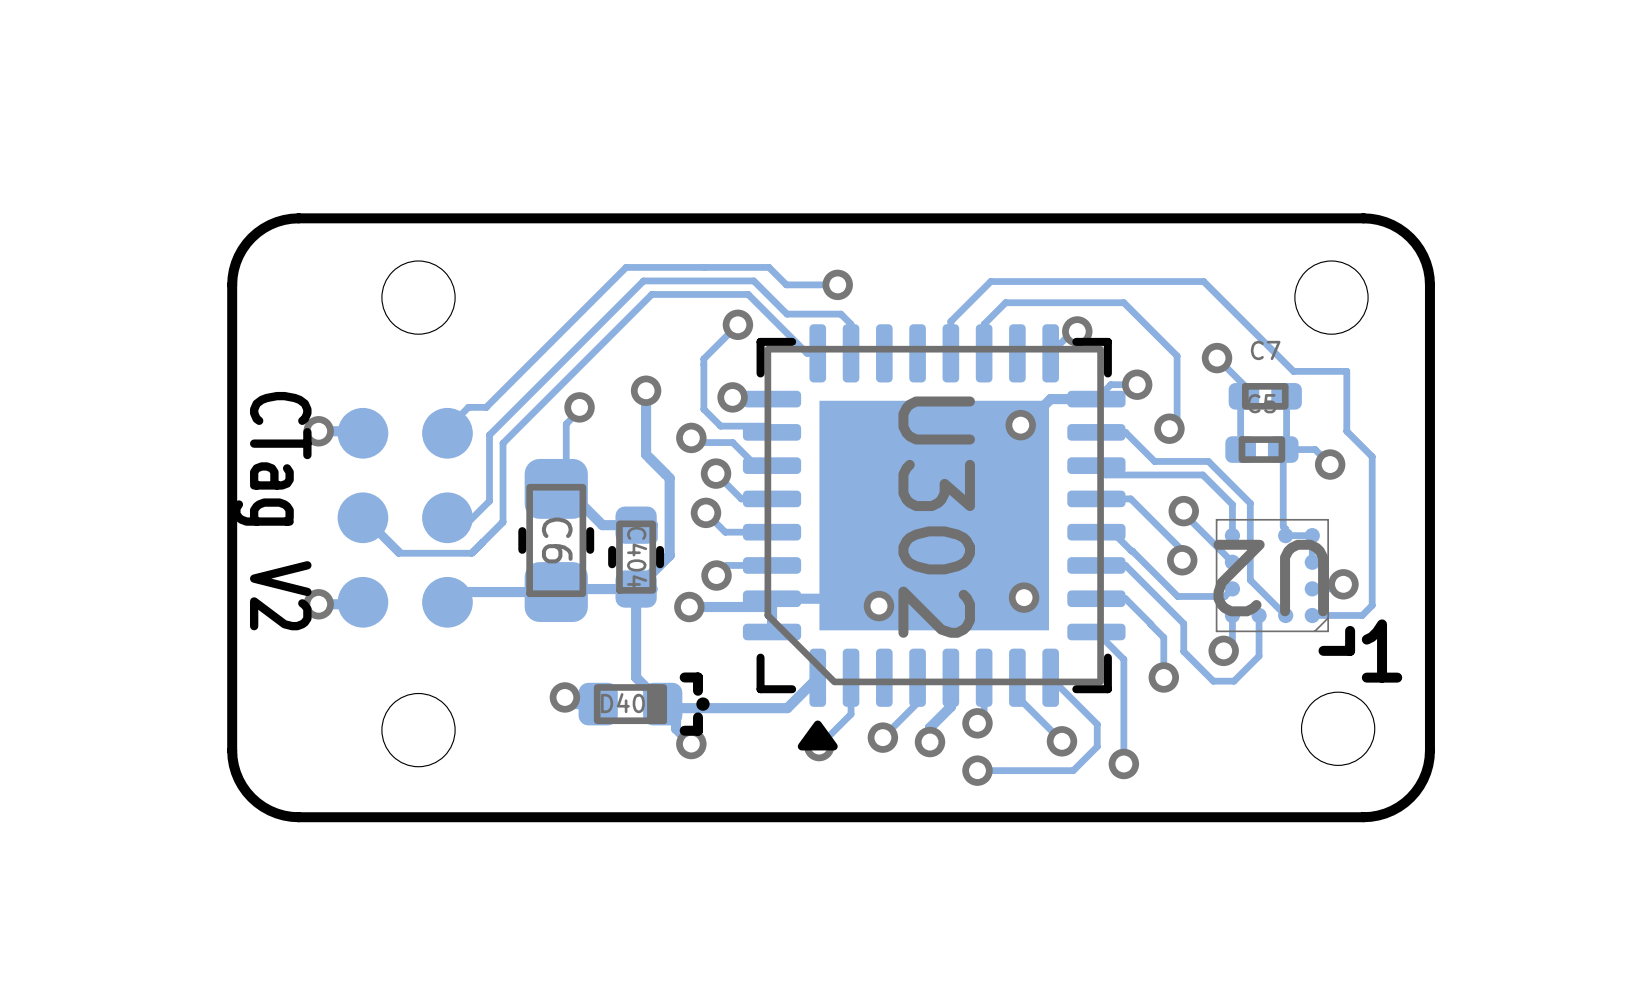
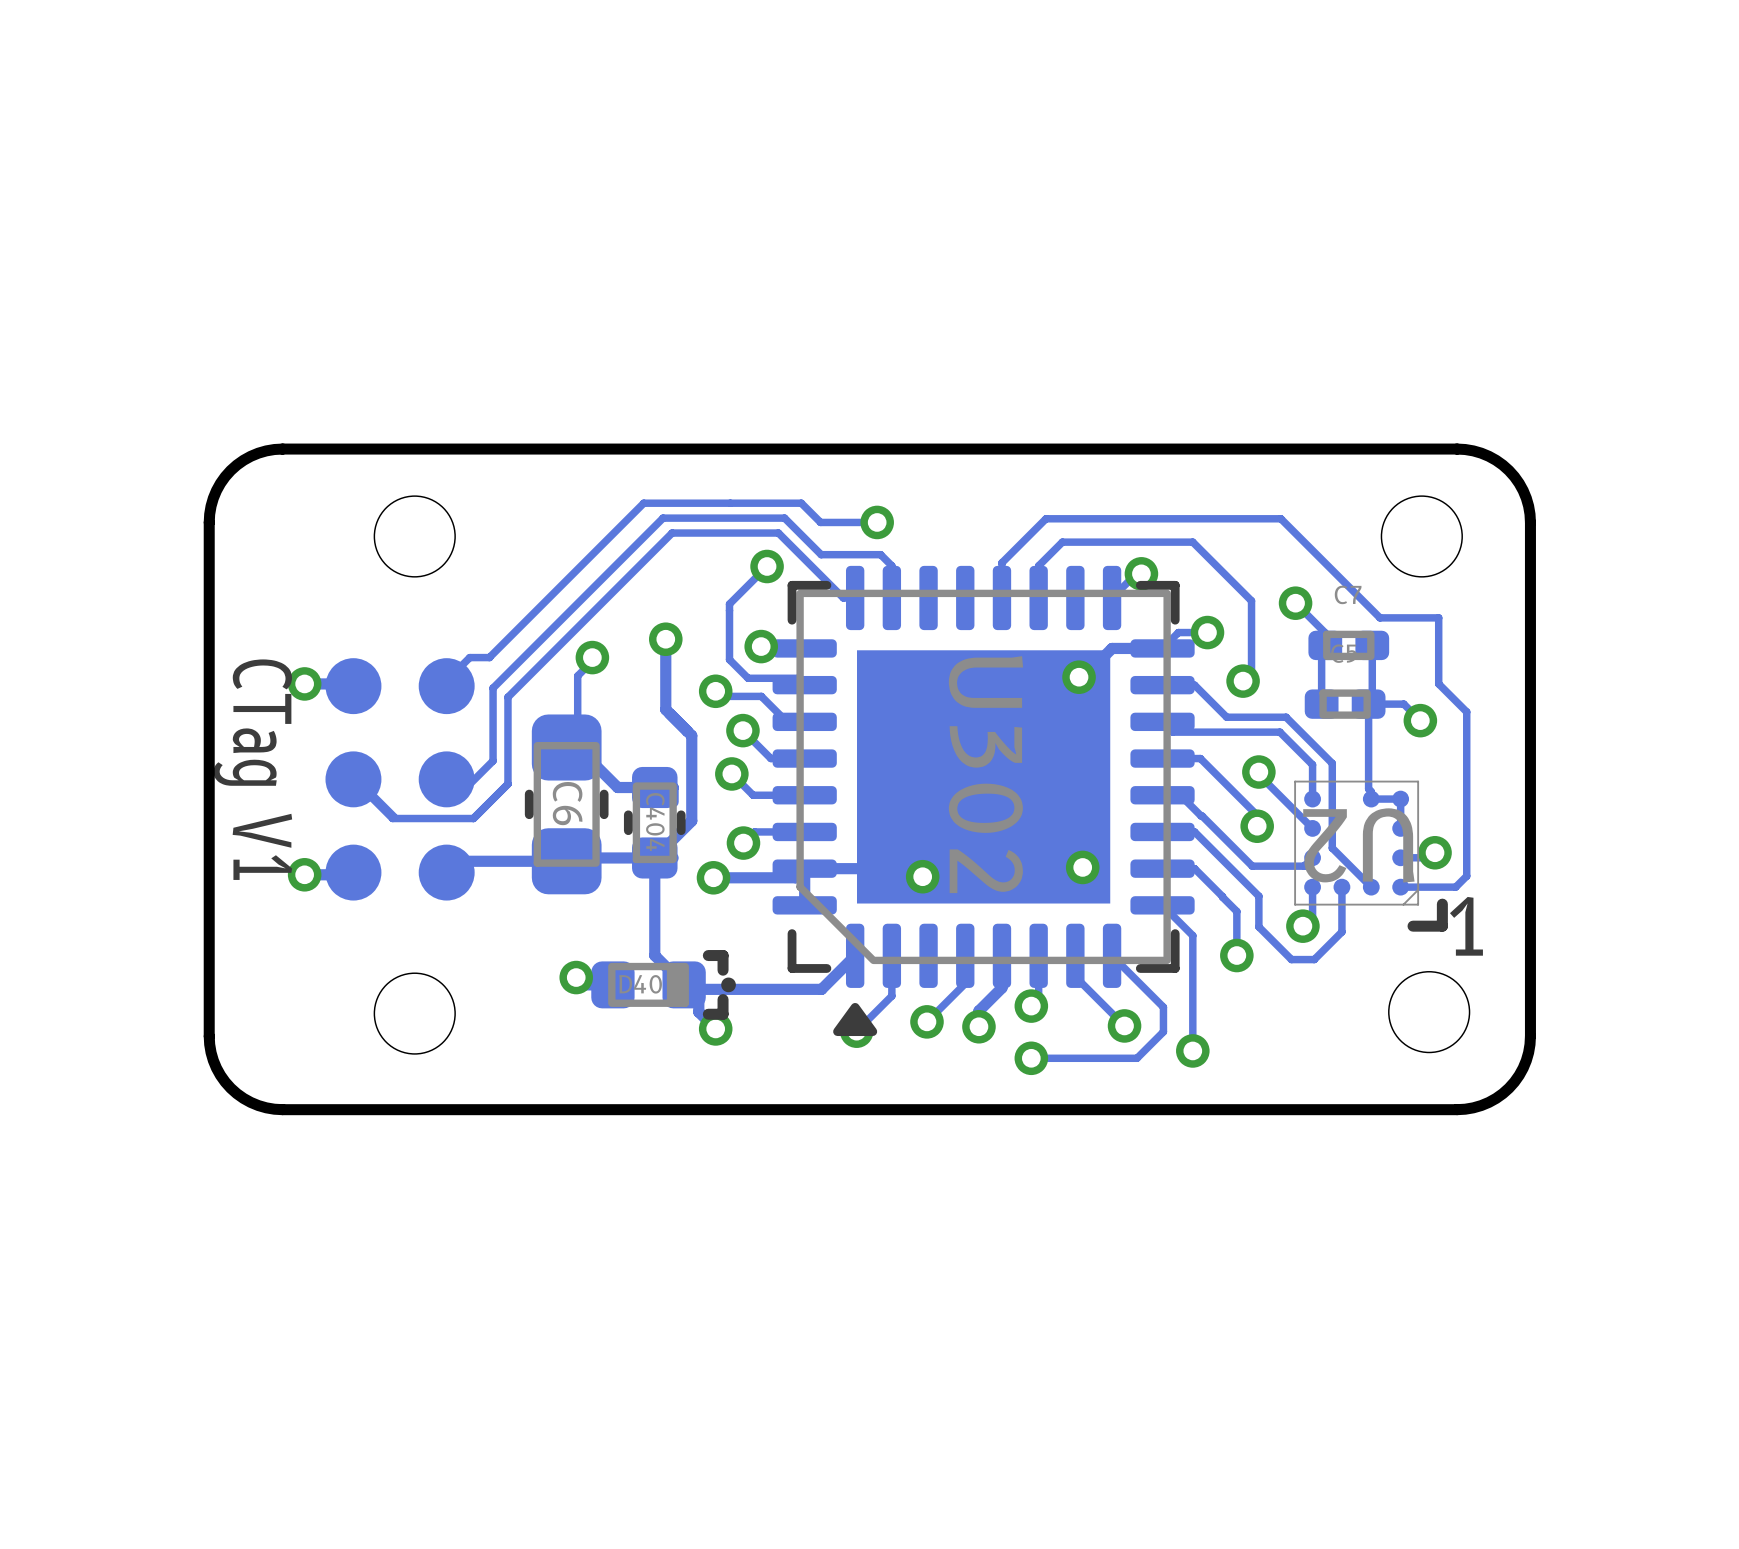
text: CTag V2 (271, 511) -> CTag V1 (252, 769)

